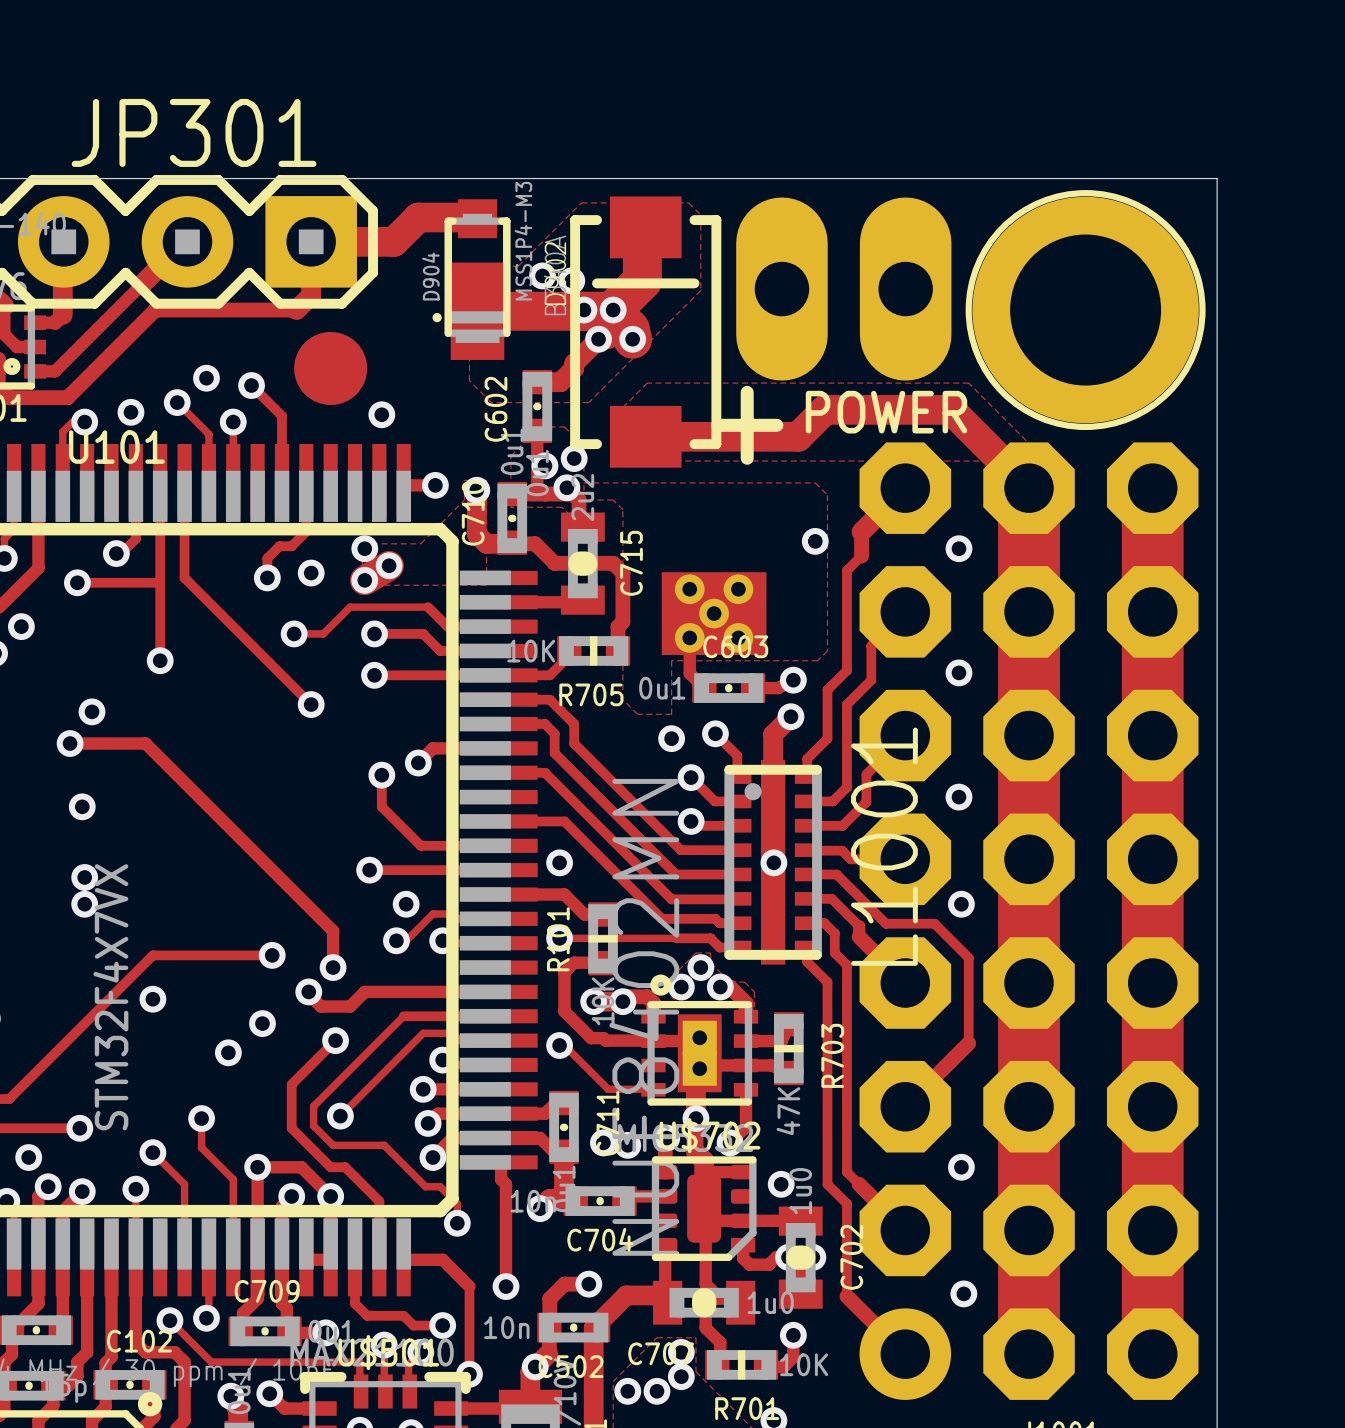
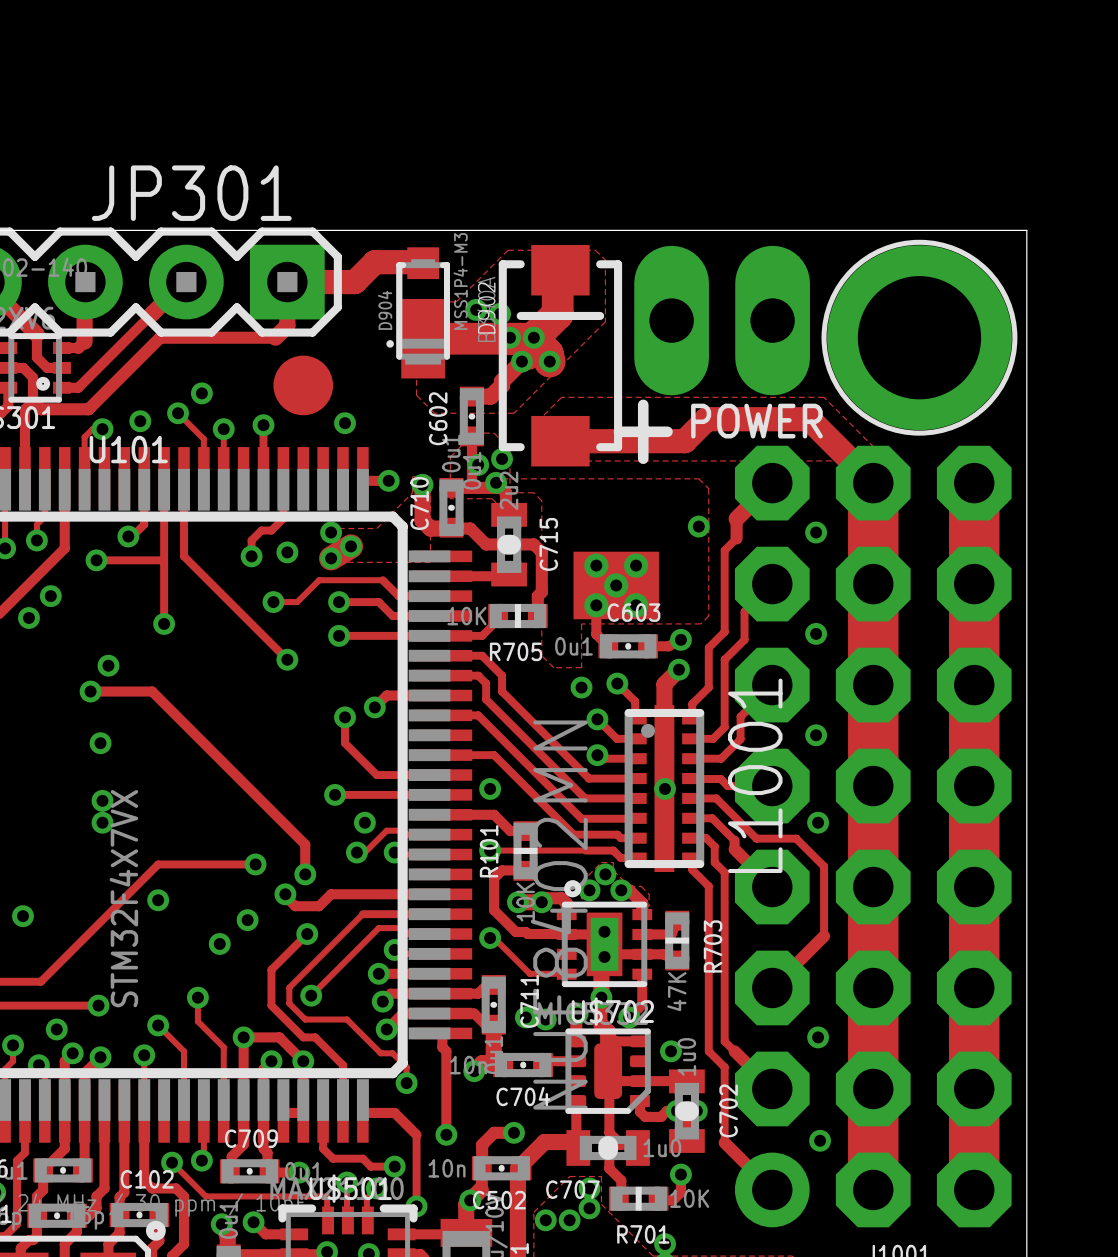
track: (251, 385) (281, 417) -> none
via position: (251, 385) -> (263, 425)

